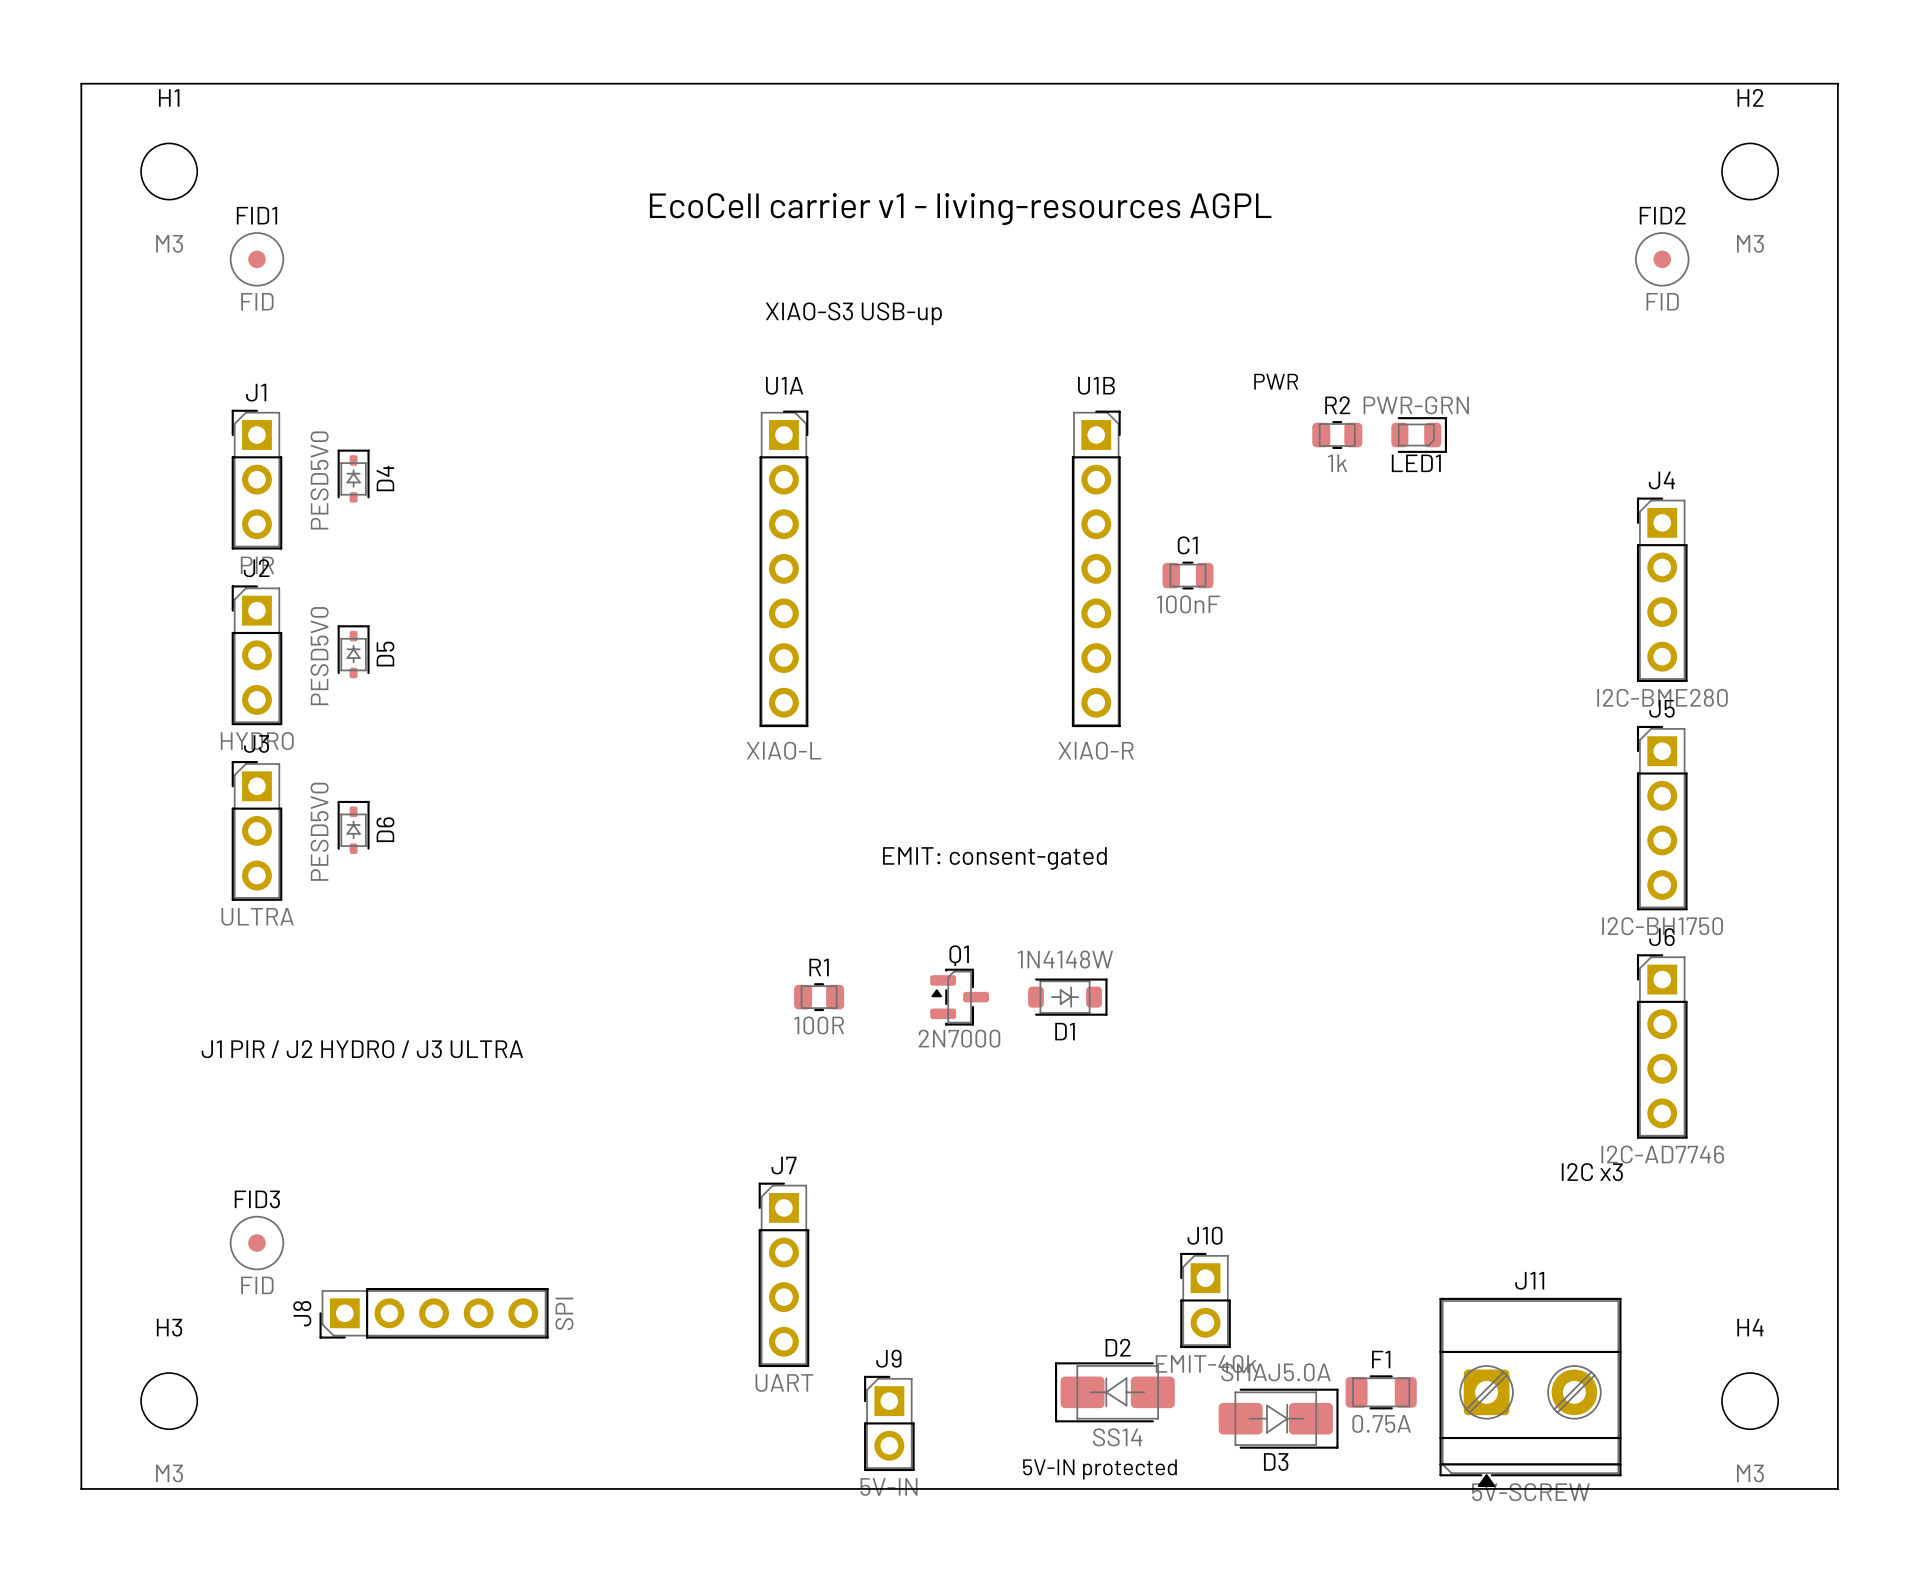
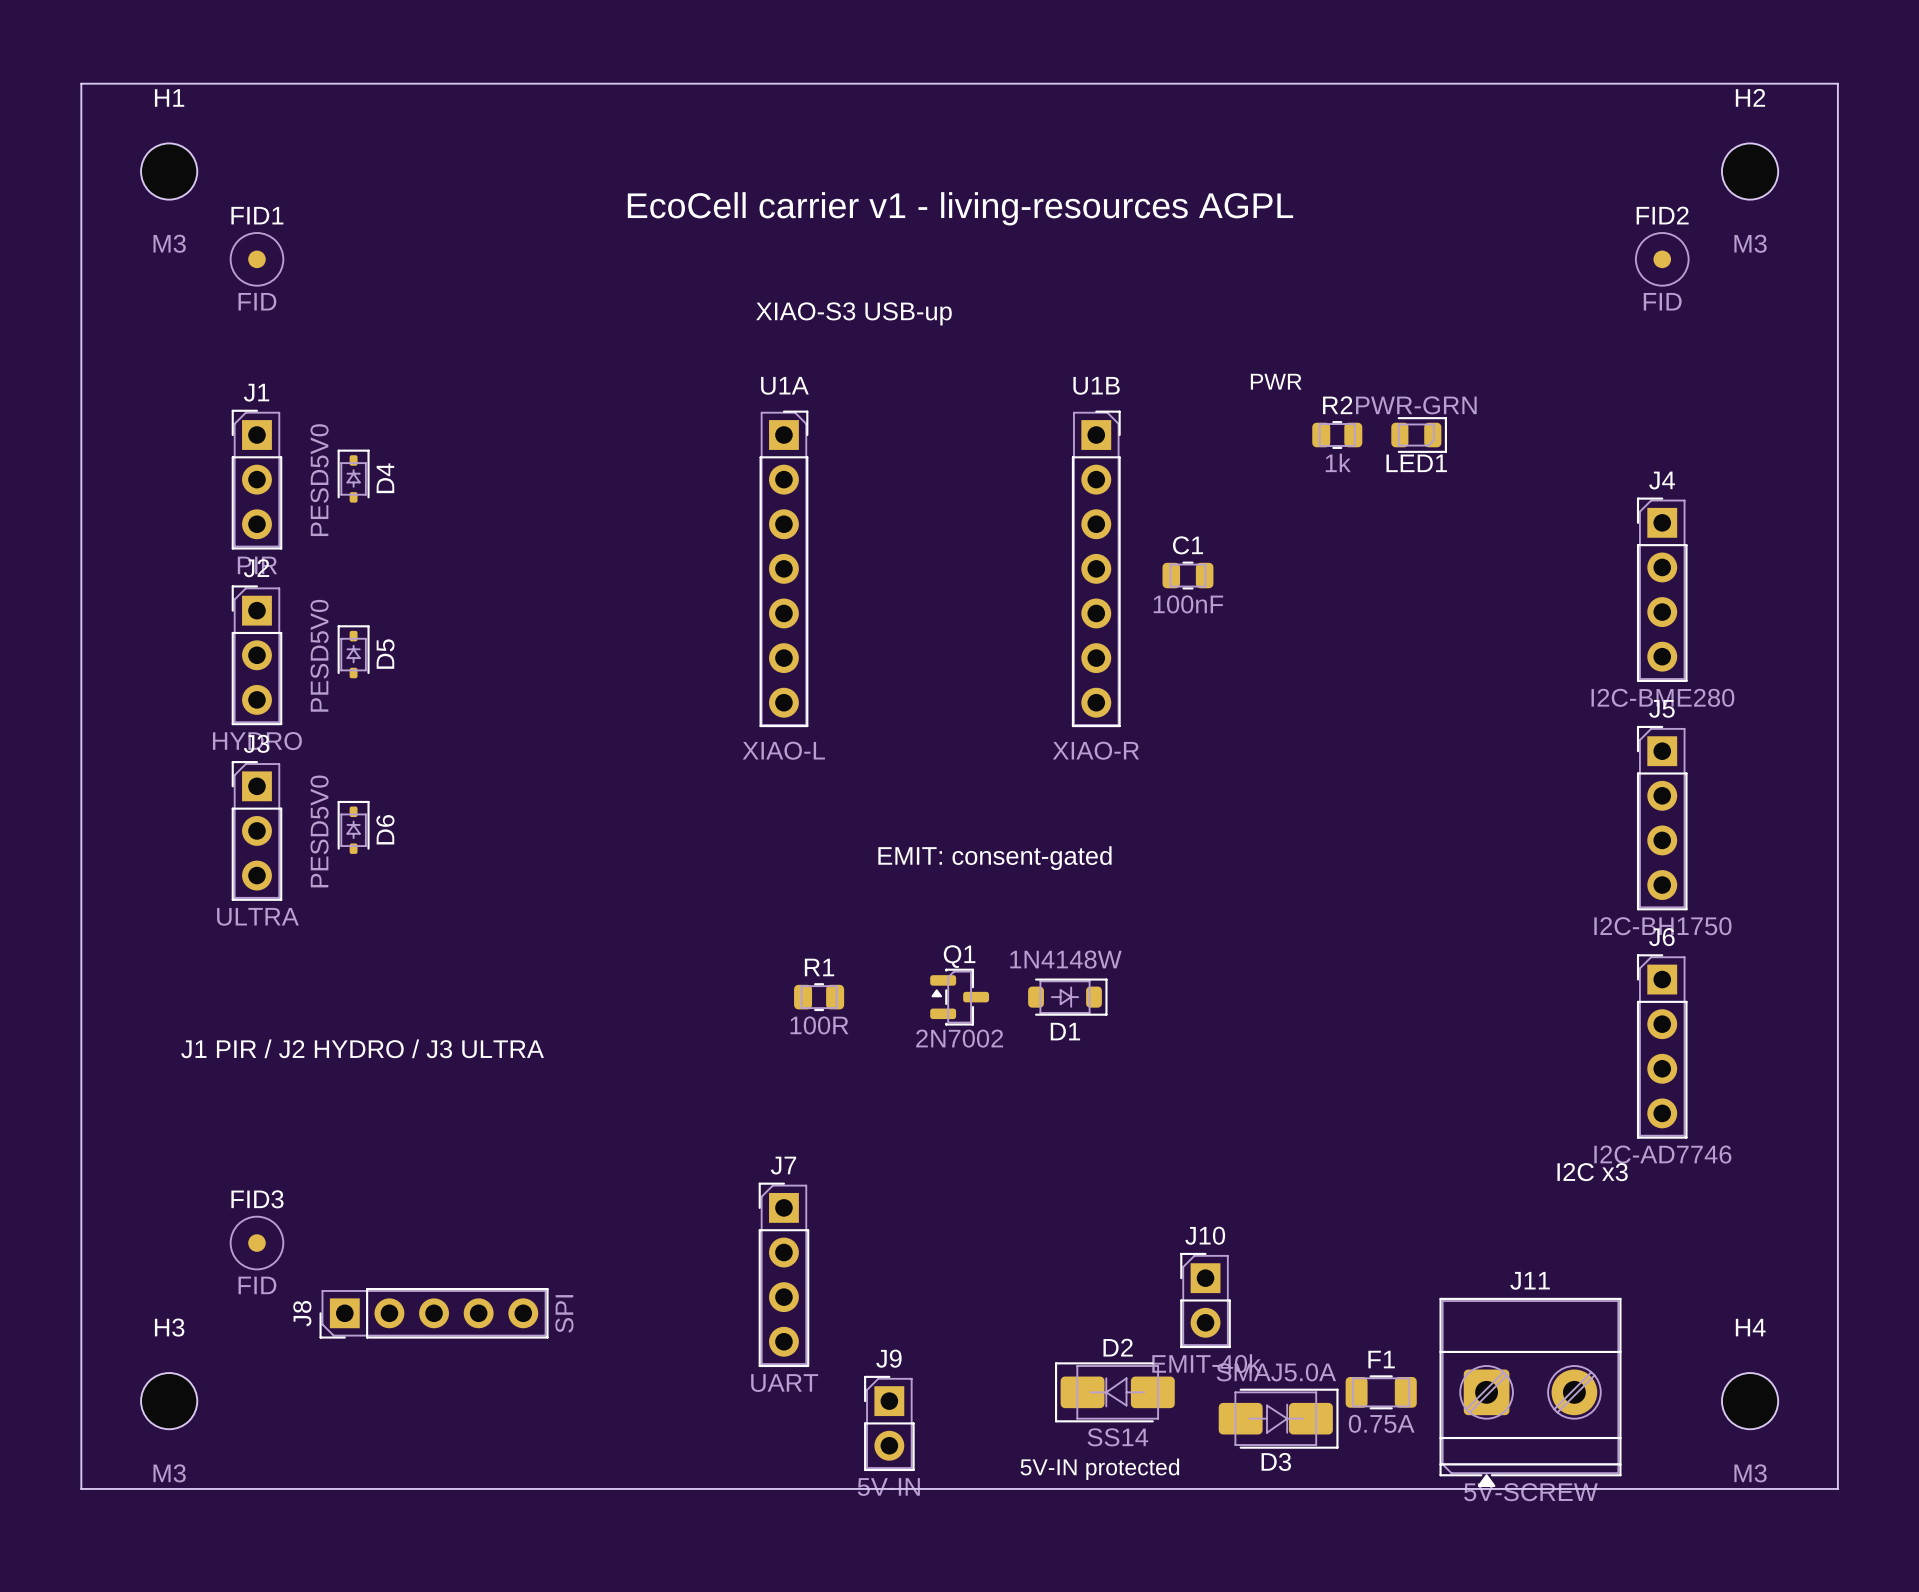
Q1 value: 2N7000 (959, 1038) -> 2N7002 (959, 1038)

